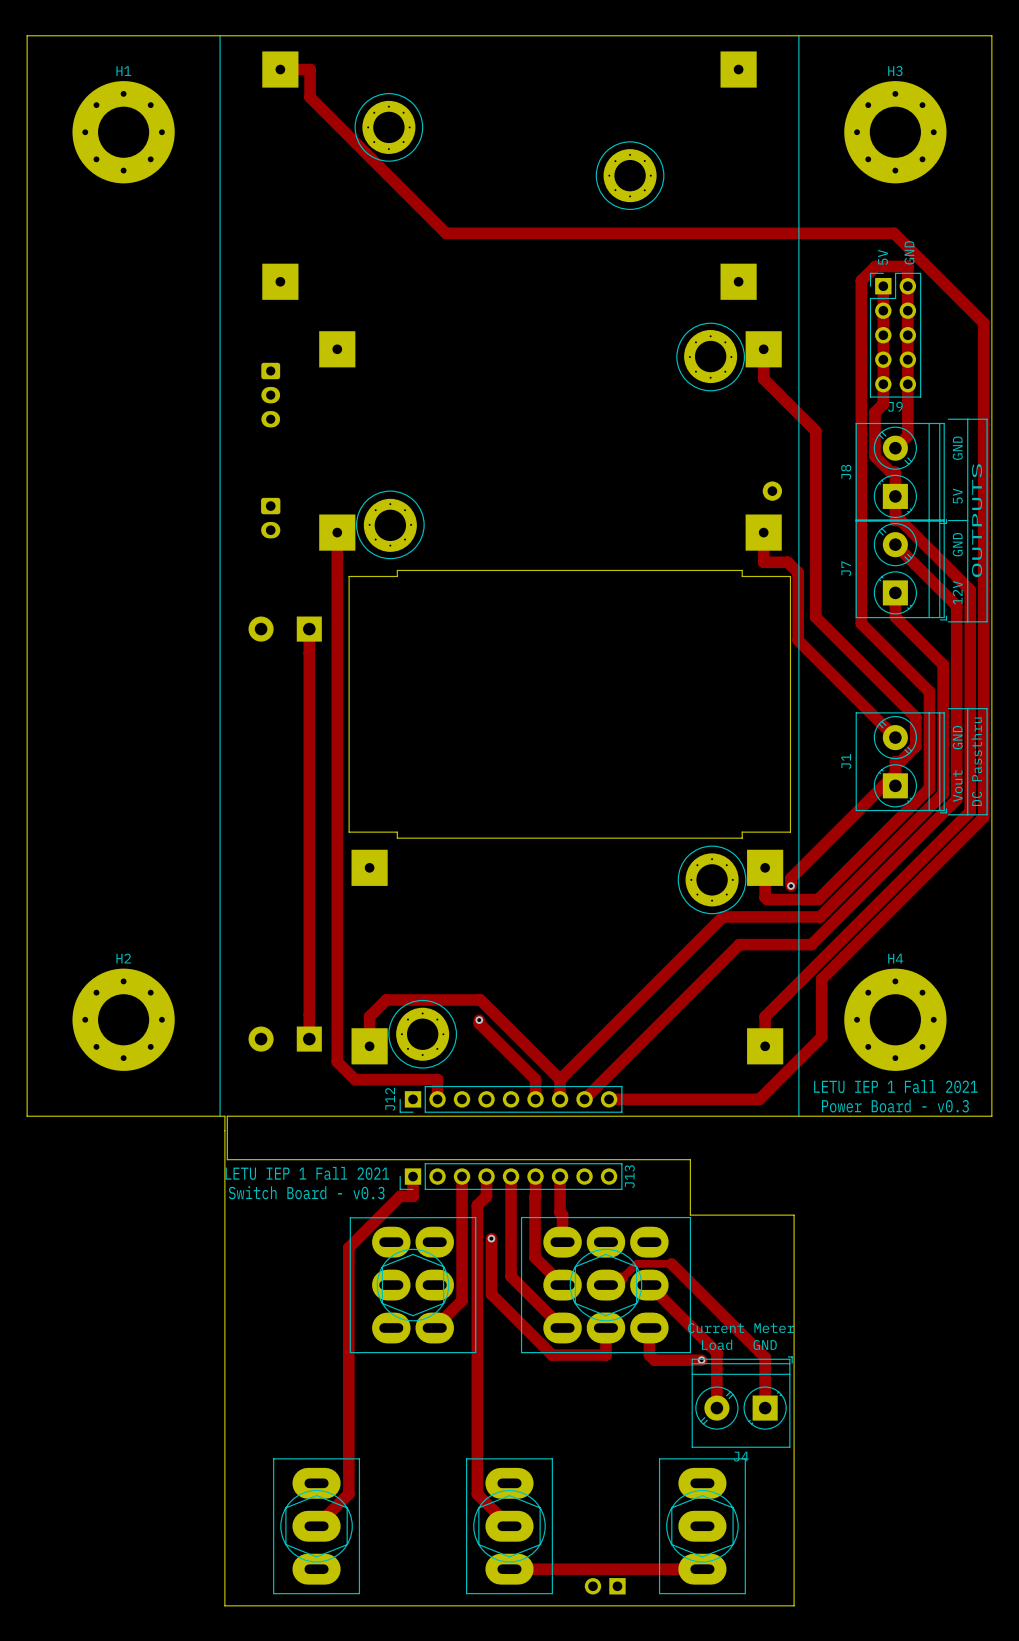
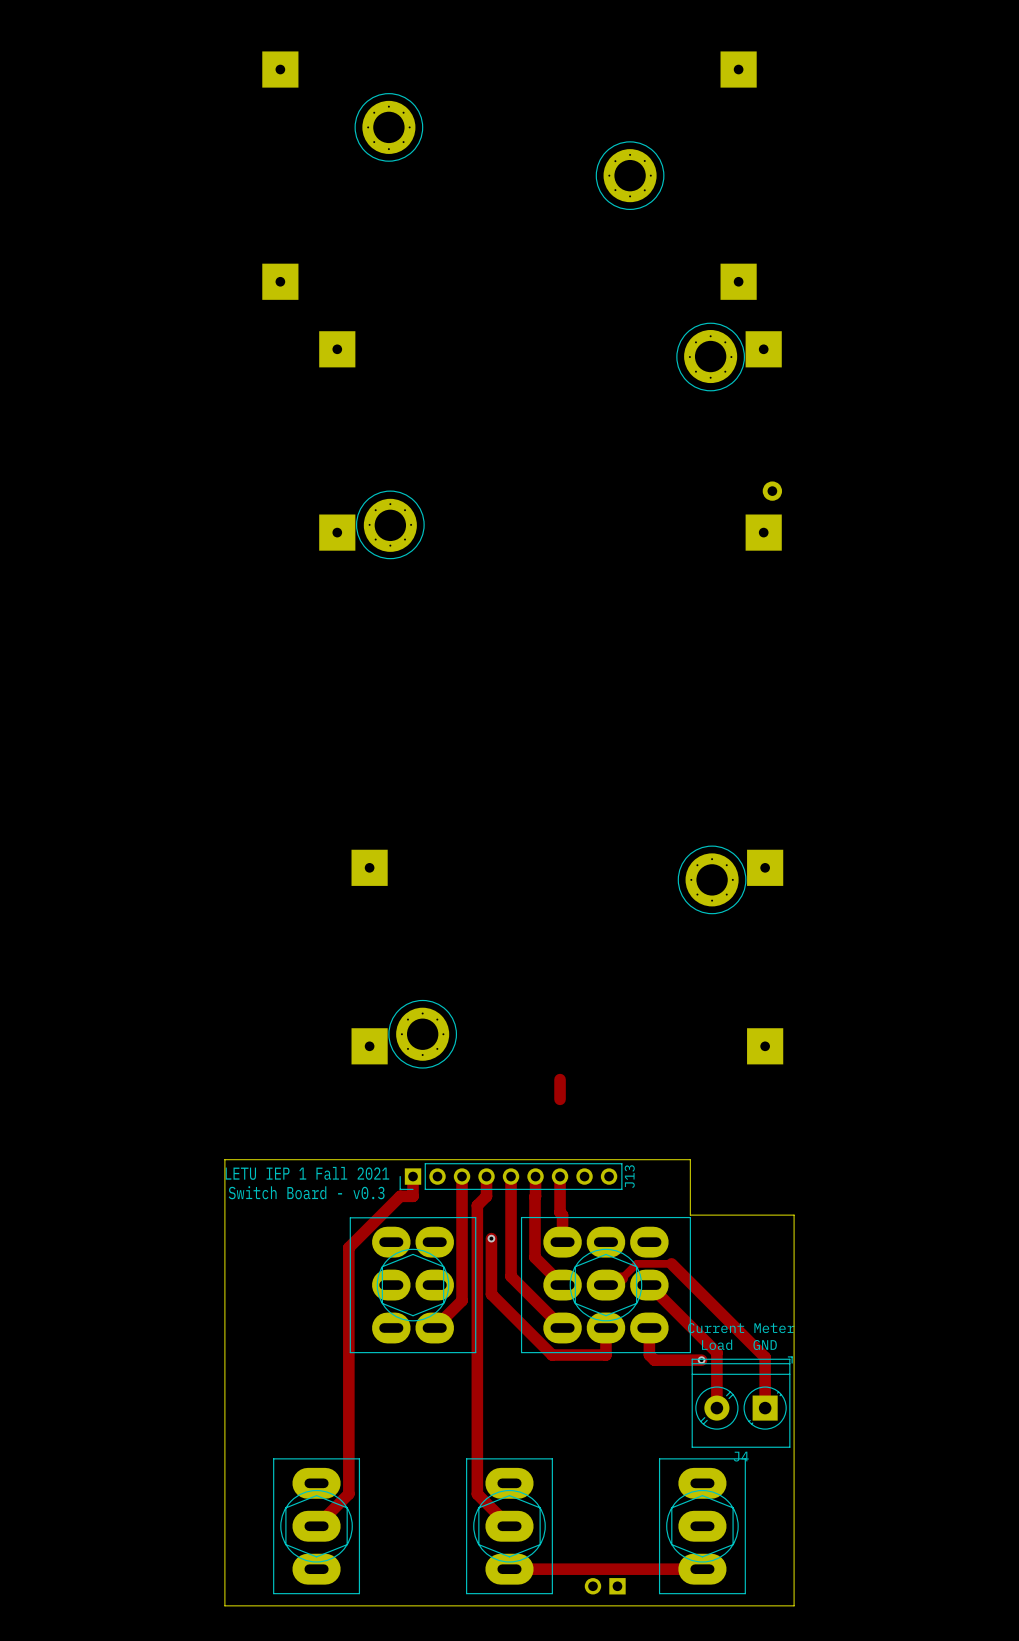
line: (220, 35) (220, 1116) -> none
line: (798, 35) (798, 1116) -> none
track: (280, 69) (310, 69) (310, 97) (446, 233) (894, 233) (983, 322) (983, 817) (821, 979) (821, 1037) (759, 1099) (609, 1099) -> none
H1: (123, 132) -> none
H3: (895, 132) -> none
text: GND (909, 252) -> none
text: 5V (883, 257) -> none
track: (883, 286) (883, 403) (875, 412) (875, 456) (890, 472) (895, 472) (895, 520) (900, 520) (970, 590) (970, 811) (765, 1016) (765, 1046) -> none
J9: (895, 335) -> none
track: (763, 349) (763, 378) (815, 431) (815, 617) (915, 717) (915, 746) (900, 761) (895, 761) (895, 785) -> none
part: (270, 395) -> none
line: (948, 419) (987, 419) (987, 621) (948, 621) -> none
line: (967, 419) (967, 621) -> none
track: (895, 448) (907, 435) (907, 266) (875, 266) (861, 280) (861, 623) (929, 691) (929, 788) (818, 899) (767, 899) (765, 897) (765, 867) -> none
text: GND (957, 448) -> none
J8: (901, 473) -> none
text: 5V (957, 496) -> none
part: (270, 518) -> none
line: (948, 520) (967, 520) -> none
text: OUTPUTS (977, 520) -> none
track: (337, 532) (337, 1061) (355, 1079) (437, 1079) (437, 1099) -> none
track: (763, 532) (763, 562) (787, 562) (798, 572) (798, 640) (895, 737) -> none
track: (895, 544) (956, 605) (956, 799) (811, 944) (739, 944) (584, 1099) -> none
text: GND (957, 544) -> none
J7: (901, 569) -> none
board edge: (397, 570) (742, 570) (742, 576) (790, 576) (790, 832) (742, 832) (742, 838) (397, 838) (397, 832) (349, 832) (349, 576) (397, 576) (397, 570) -> none
track: (895, 592) (895, 617) (943, 664) (943, 793) (820, 916) (722, 916) (560, 1079) (480, 999) (386, 999) (369, 1016) (369, 1046) -> none
text: 12V (957, 592) -> none
part: (285, 629) -> none
track: (309, 629) (309, 1039) -> none
line: (948, 708) (987, 708) (987, 814) (948, 814) -> none
line: (967, 708) (967, 814) -> none
text: GND (957, 737) -> none
text: DC Passthru (976, 761) -> none
J1: (901, 762) -> none
track: (895, 773) (791, 878) (791, 886) -> none
text: Vout (957, 786) -> none
via: (791, 886) -> none
H2: (123, 1019) -> none
H4: (895, 1019) -> none
track: (479, 1020) (479, 1023) (535, 1079) (535, 1099) -> none
via: (479, 1020) -> none
part: (285, 1039) -> none
text: LETU IEP 1 Fall 2021 (895, 1086) -> none
J12: (511, 1099) -> none
text: Power Board - v0.3 (895, 1105) -> none
board edge: (224, 1159) (224, 1116) (27, 1116) (27, 35) (991, 35) (991, 1116) (227, 1116) (227, 1159) -> (224, 1159) (227, 1159)

